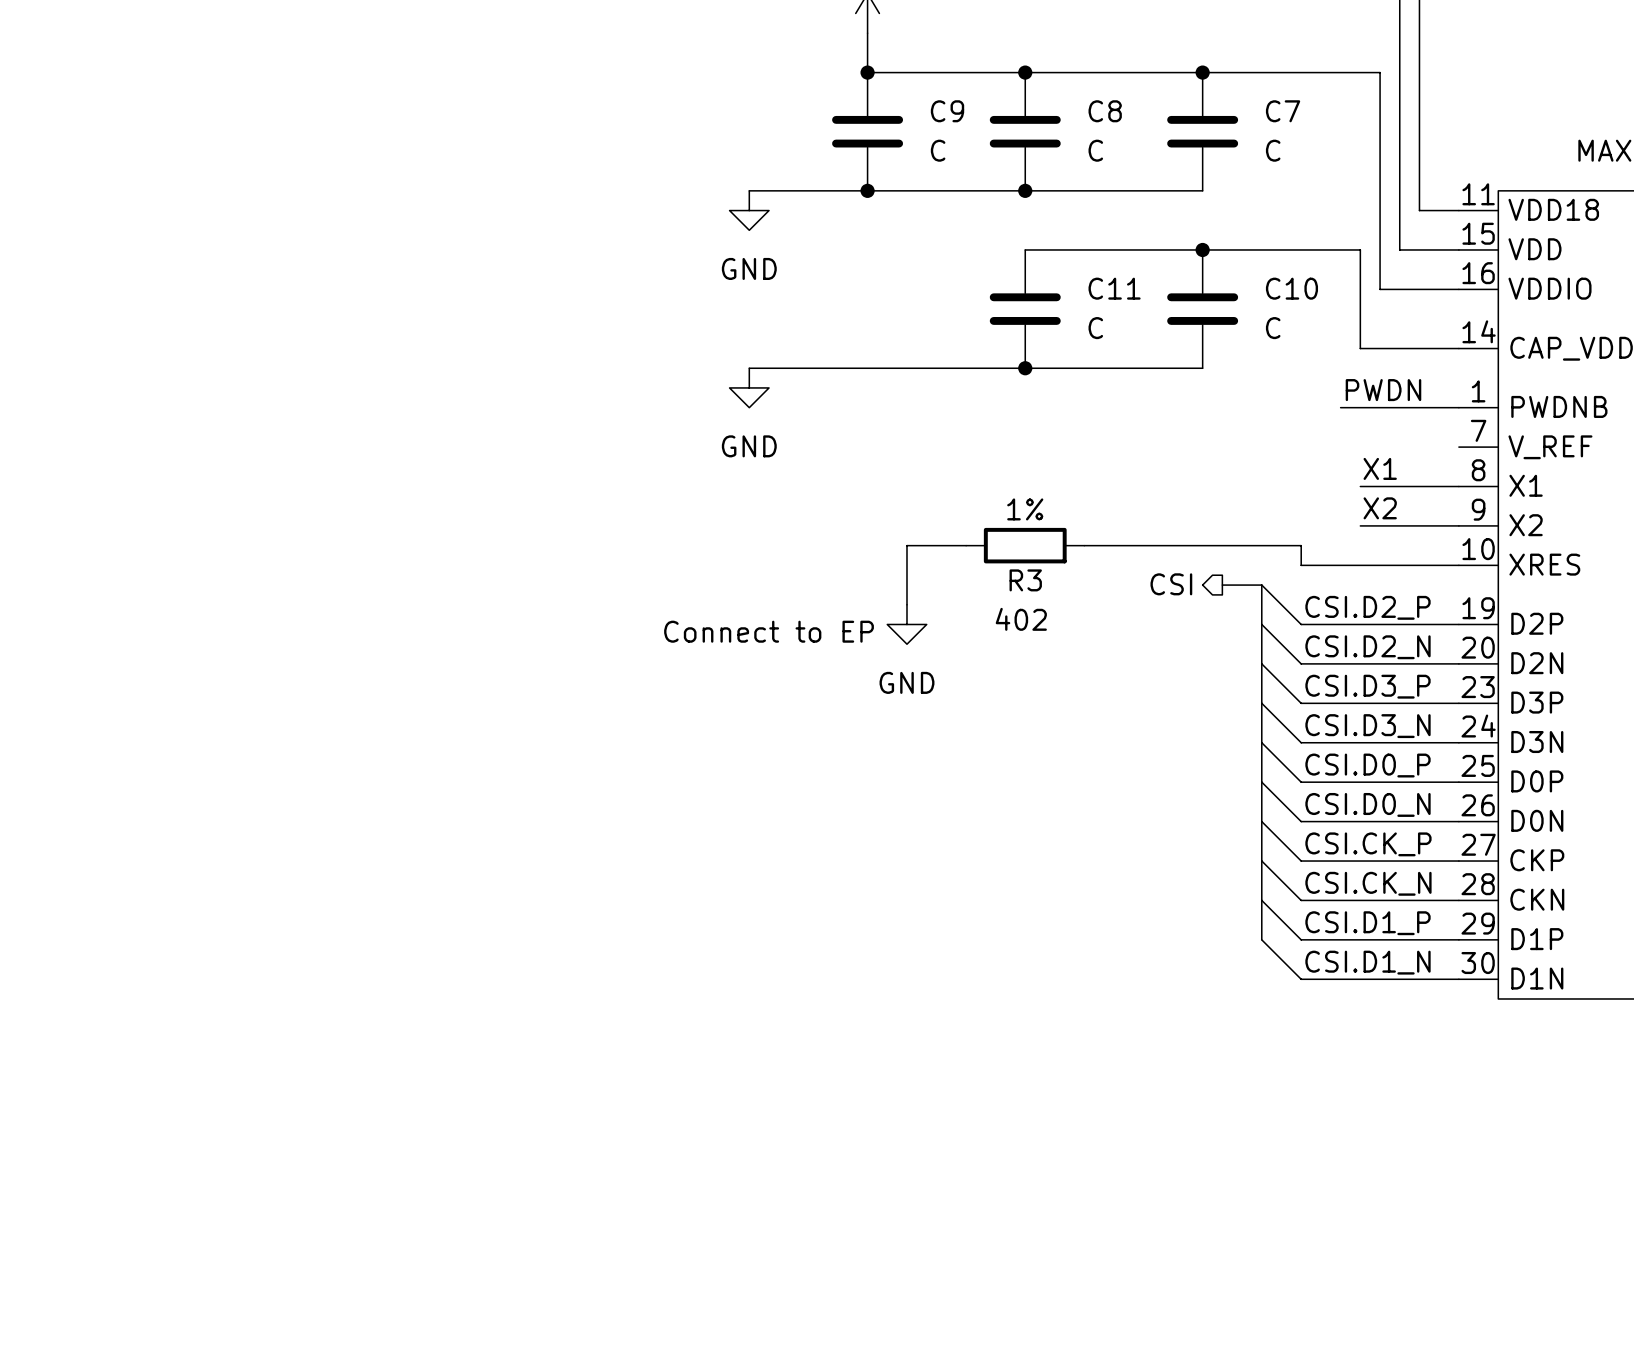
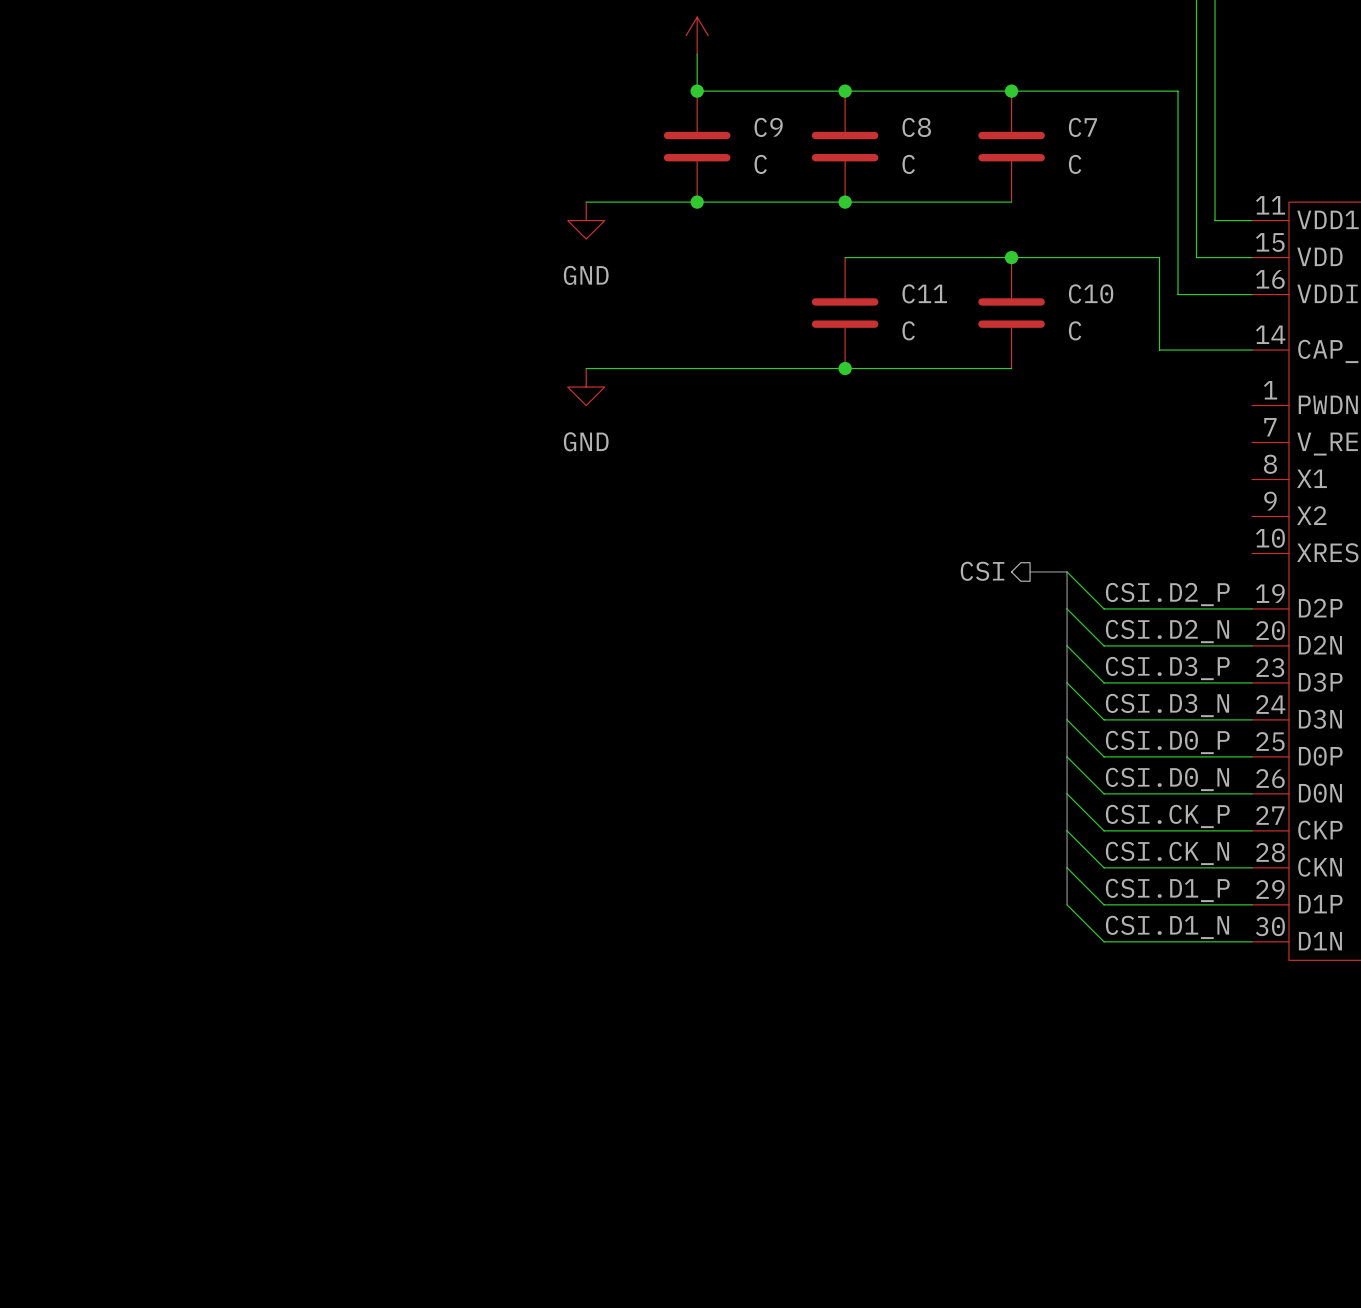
label: PWDN (1383, 390) -> none
wire: (1340, 407) (1458, 407) -> none
label: X1 (1380, 468) -> none
wire: (1360, 486) (1458, 486) -> none
label: X2 (1380, 508) -> none
wire: (1360, 525) (1458, 525) -> none
wire: (966, 545) (906, 545) (906, 604) -> none
R3: 402 (1025, 545) -> none
wire: (1084, 545) (1301, 545) (1301, 565) (1458, 565) -> none
power symbol: GND (906, 624) -> none
text: Connect to EP (769, 631) -> none

